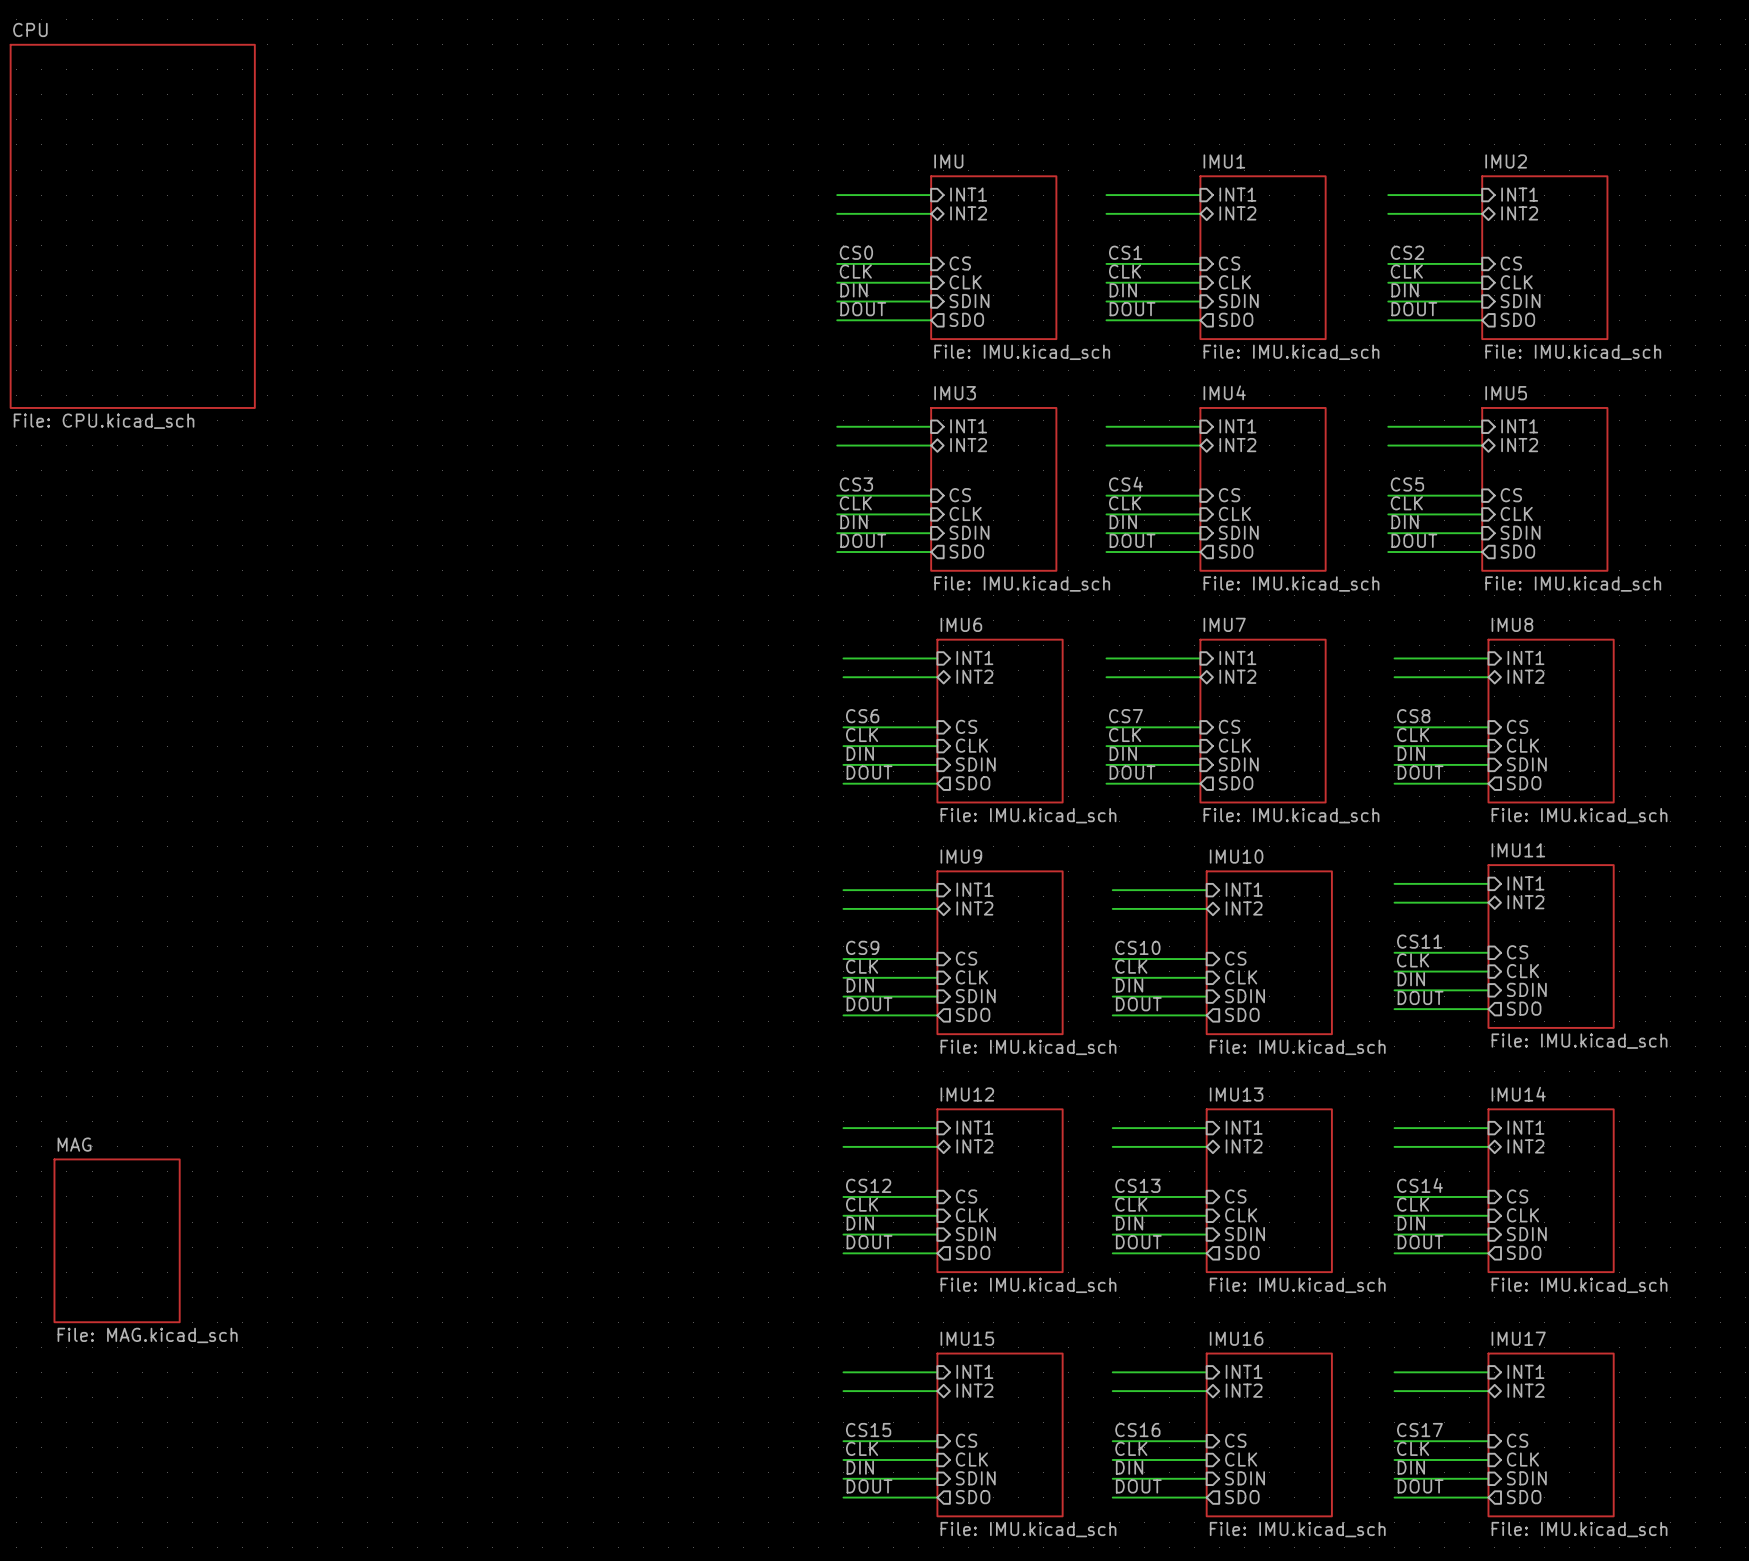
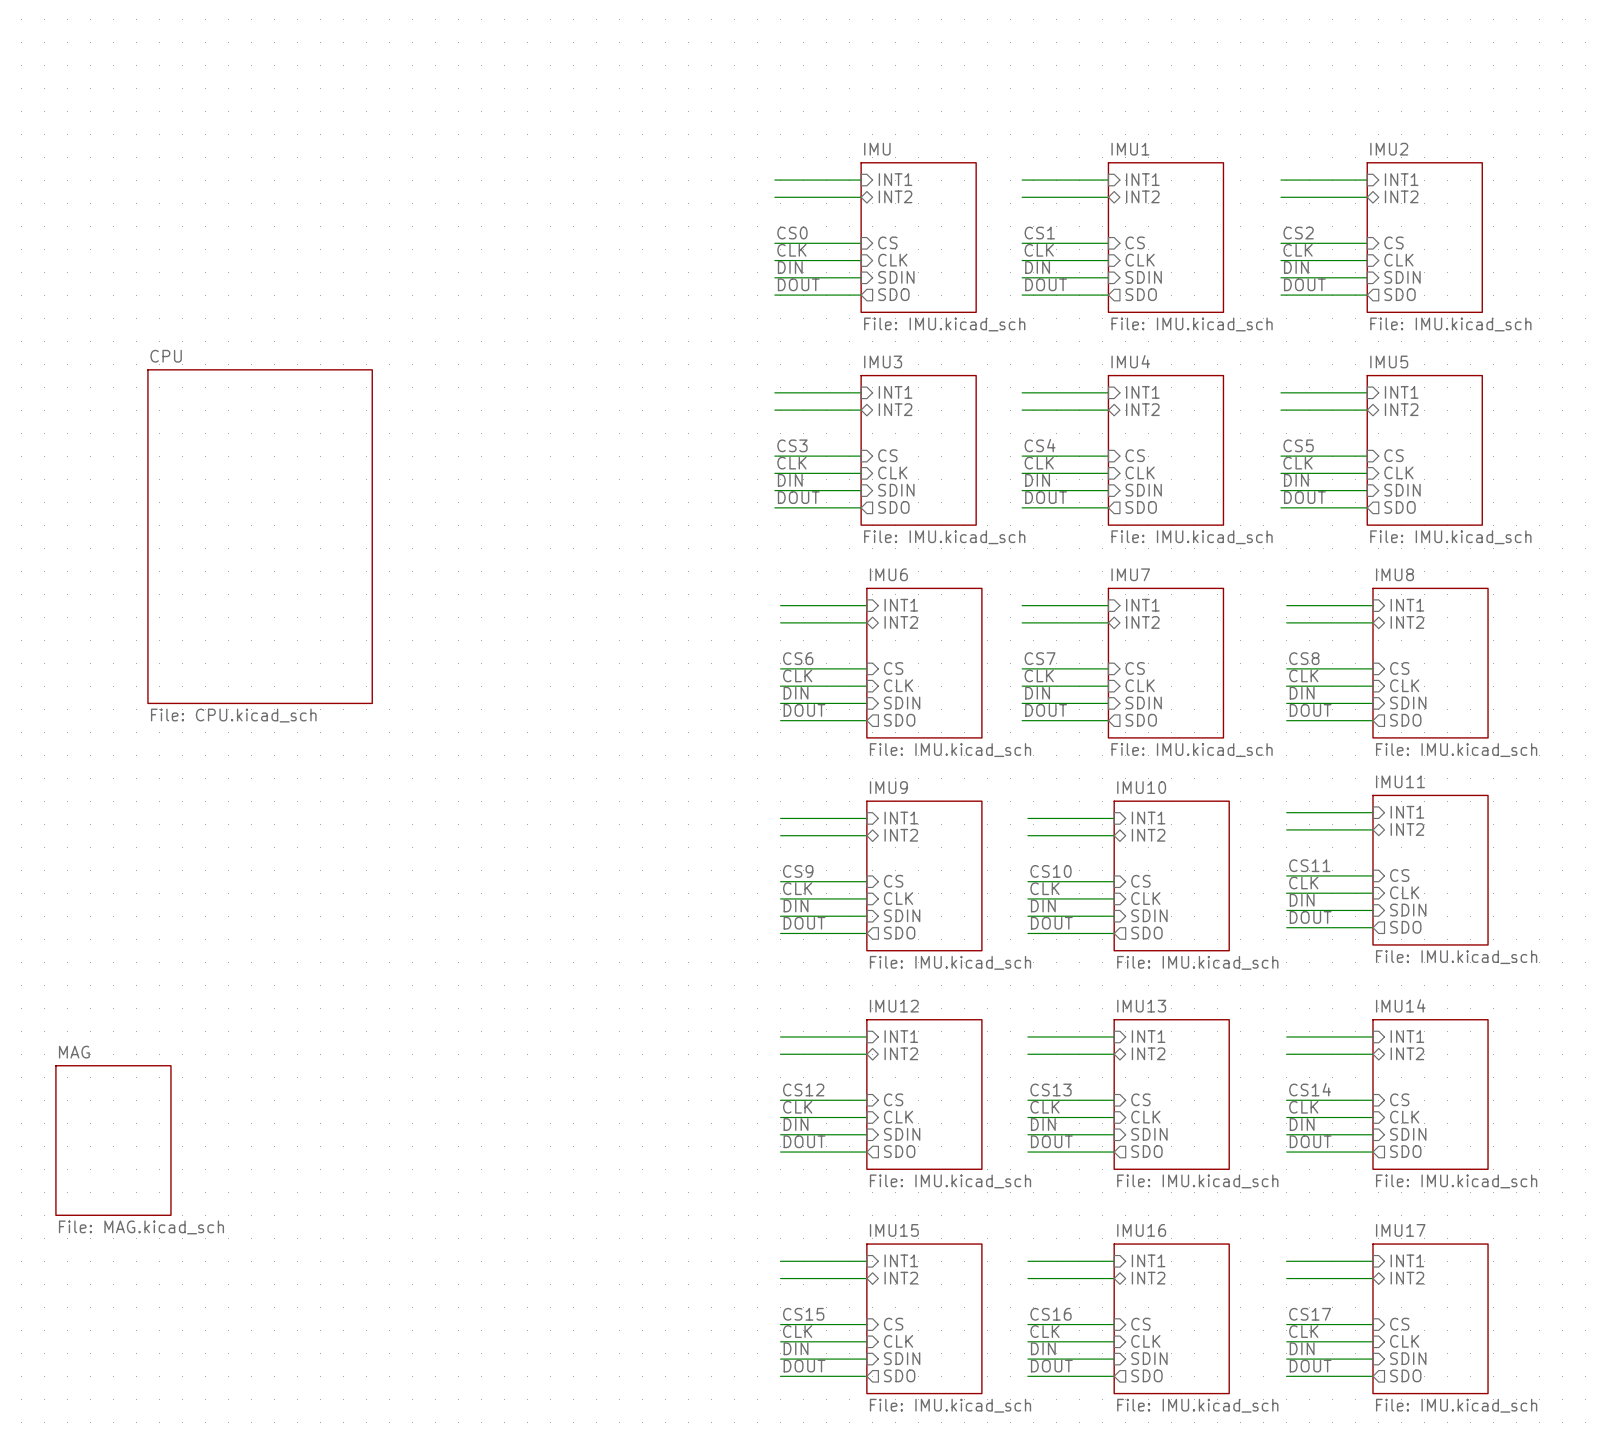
sheet CPU: File: CPU.kicad_sch (132, 226) -> none
sheet CPU: none -> File: CPU.kicad_sch (260, 536)

